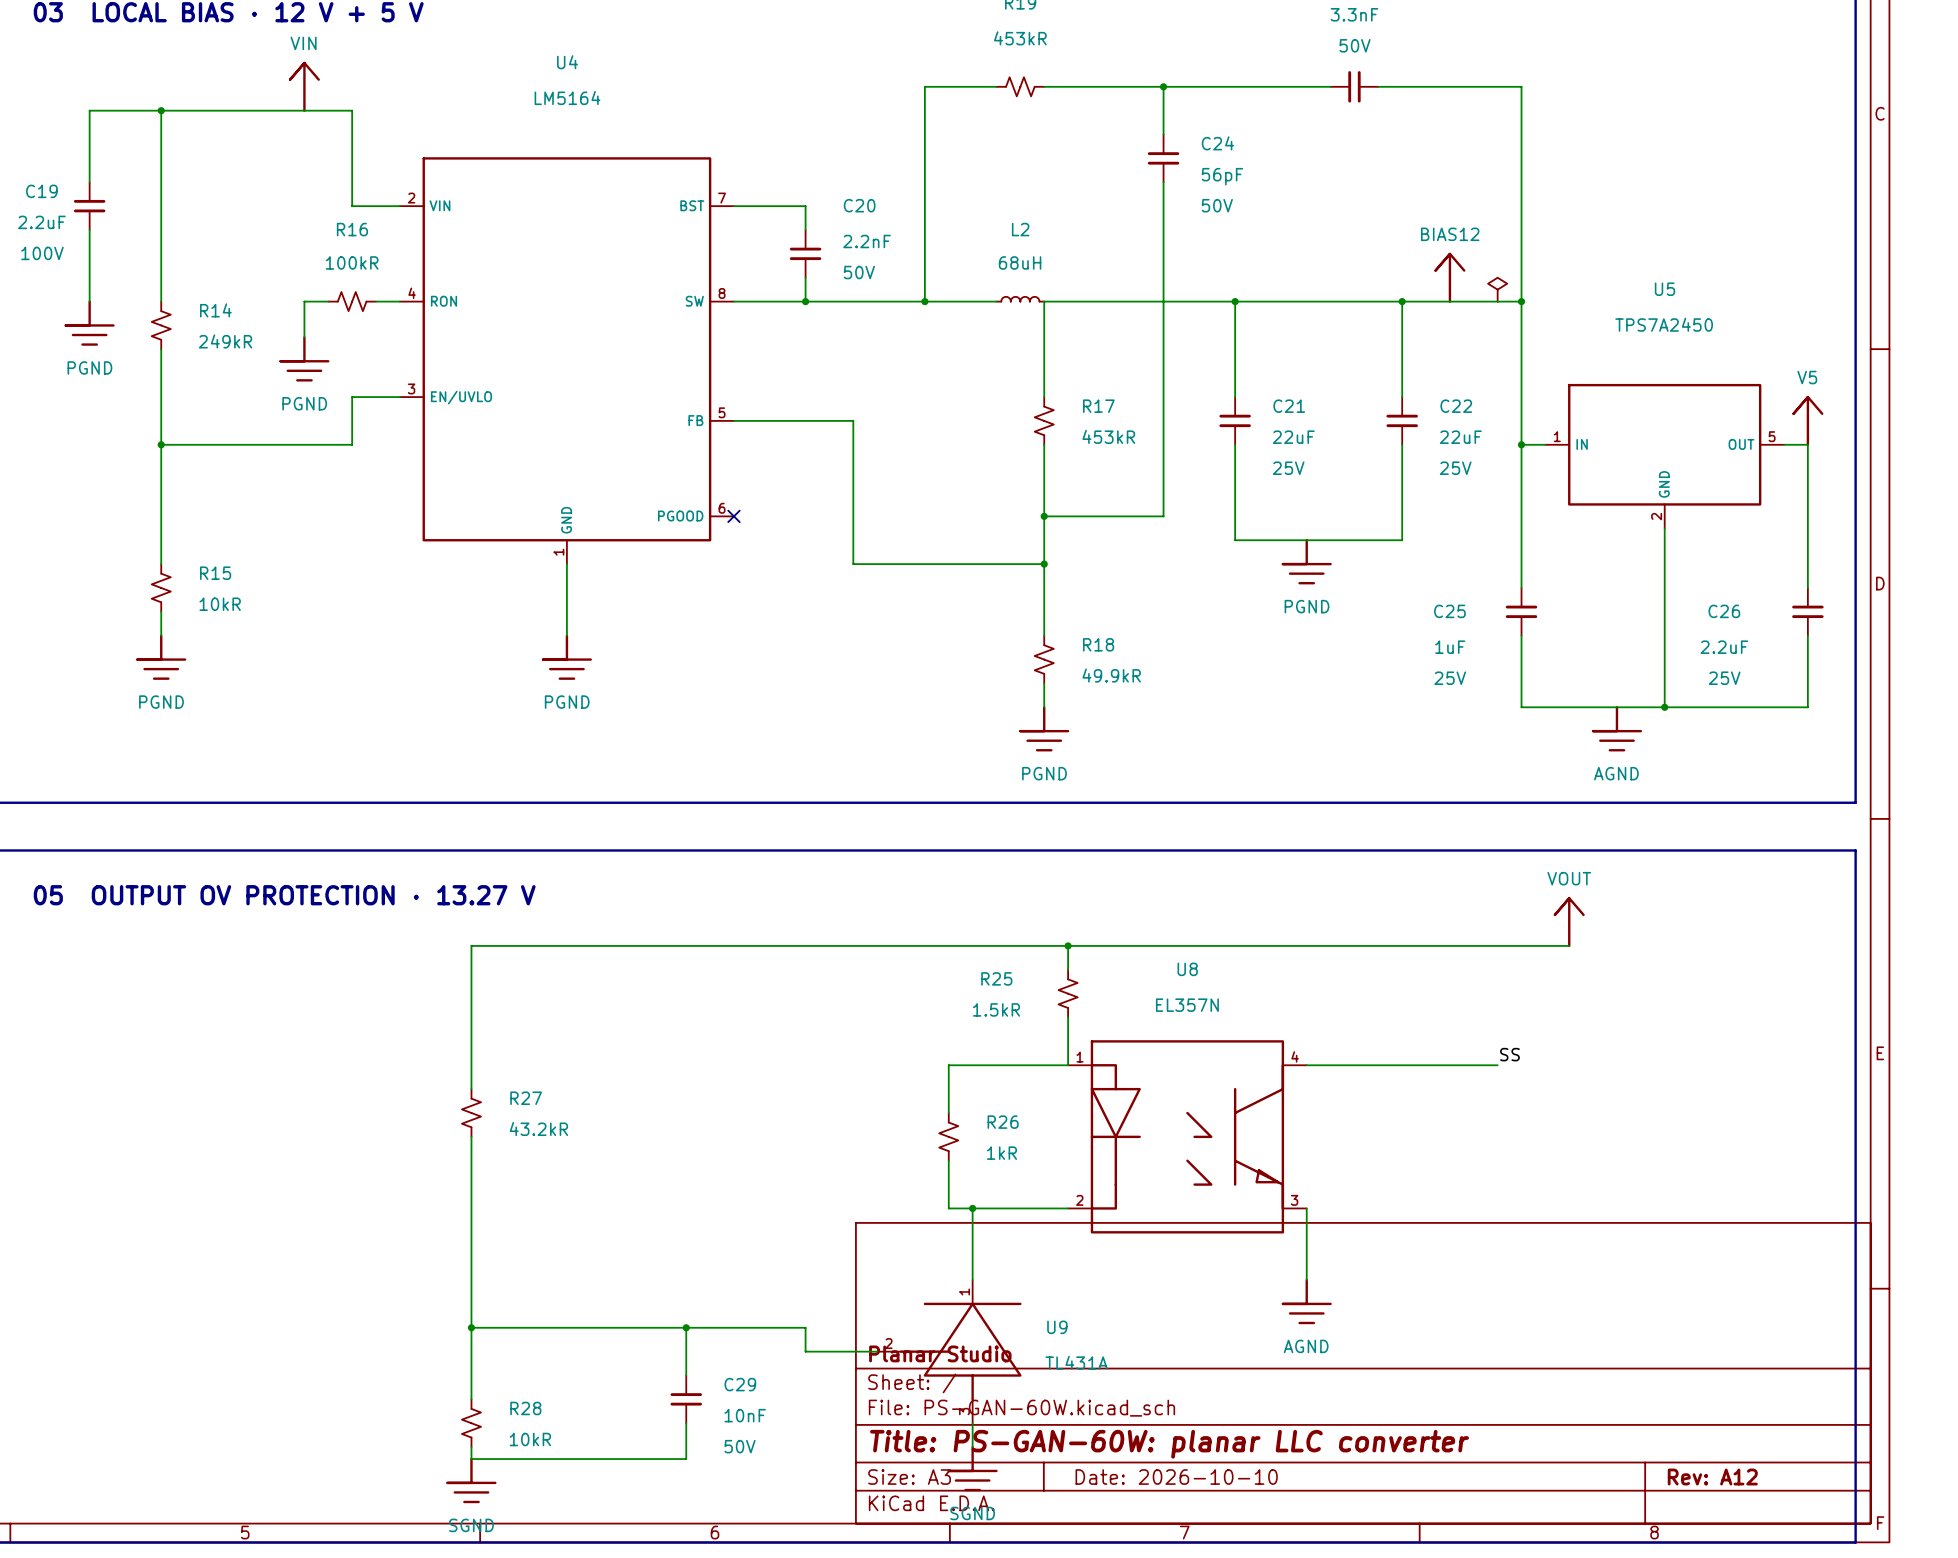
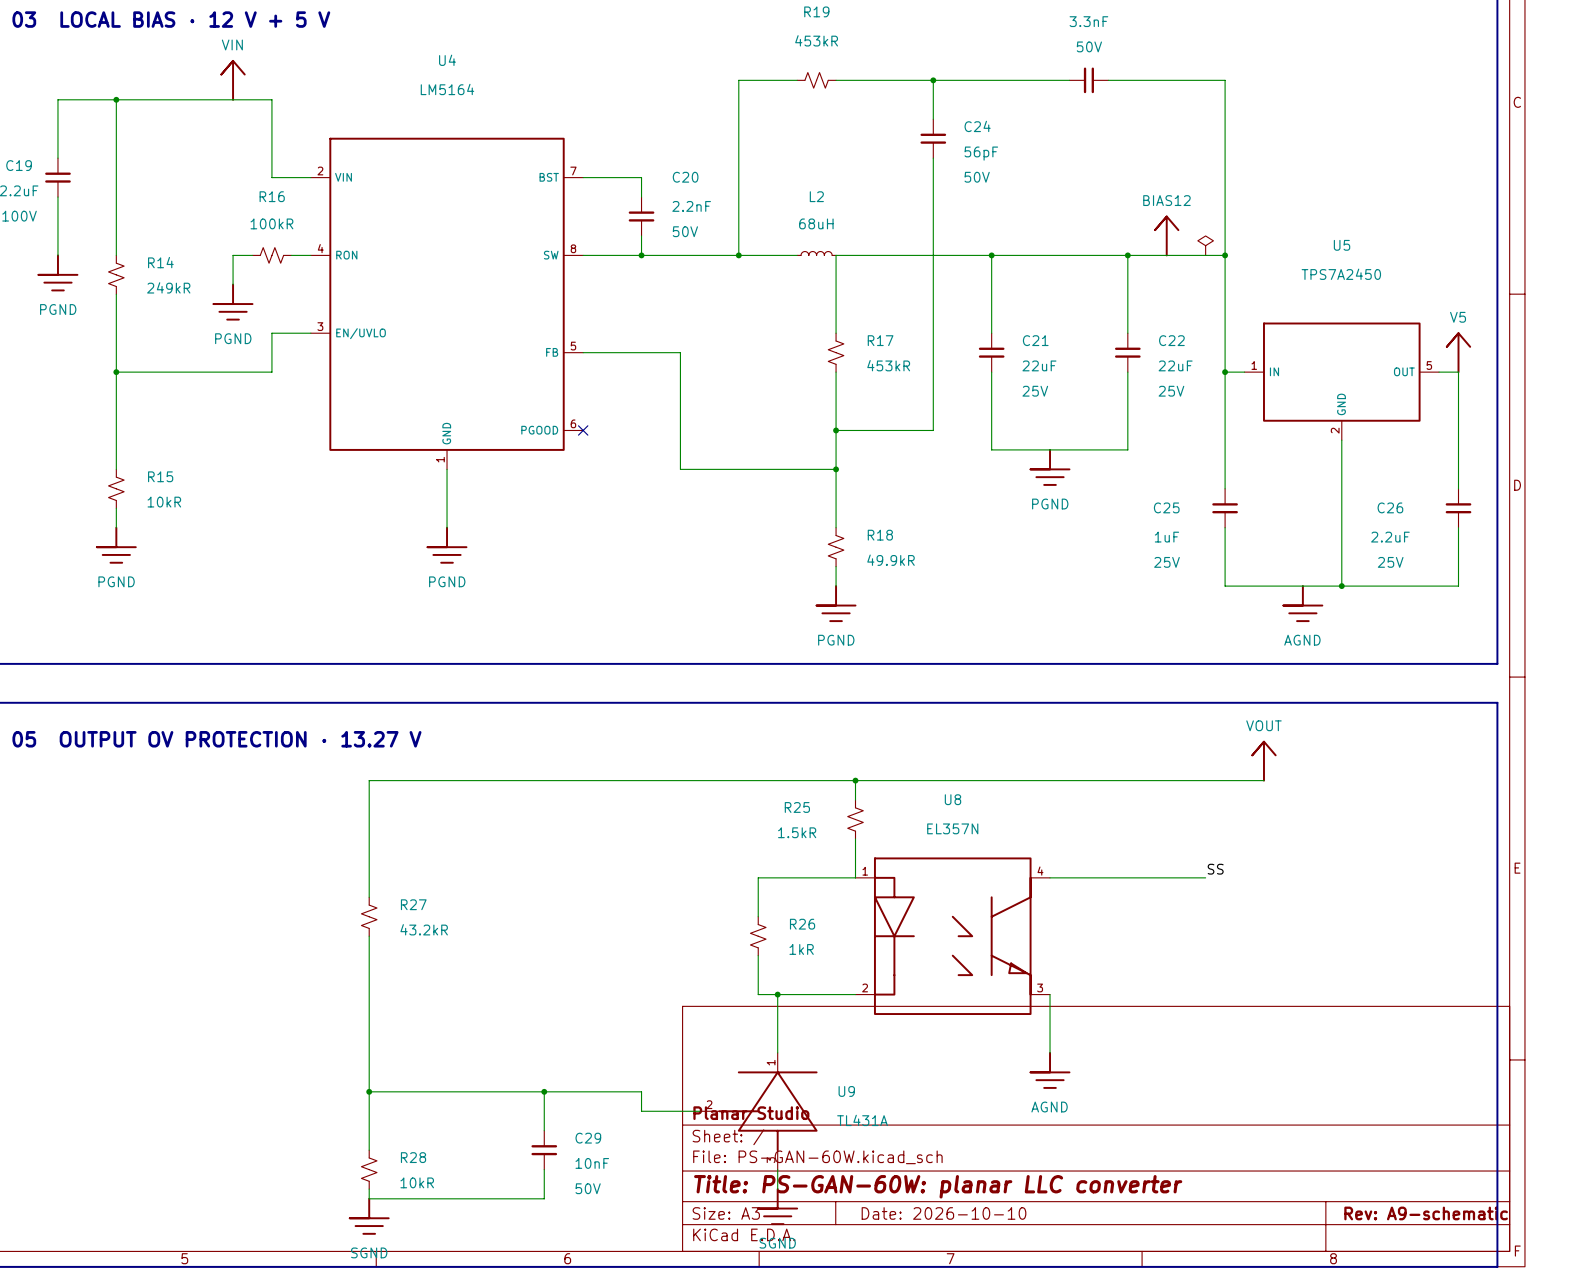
title block: Rev: A12 (1712, 1477) -> Rev: A9-schematic (1426, 1213)

